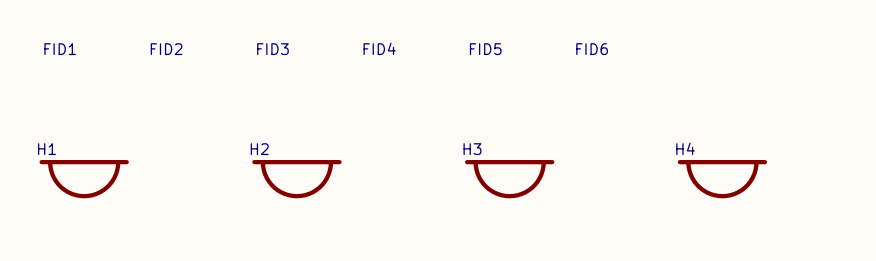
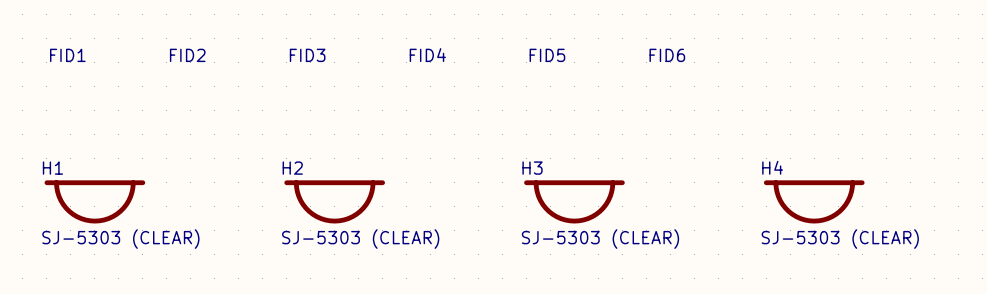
H1 value: none -> SJ-5303 (CLEAR) (120, 239)
H2 value: none -> SJ-5303 (CLEAR) (360, 239)
H3 value: none -> SJ-5303 (CLEAR) (600, 239)
H4 value: none -> SJ-5303 (CLEAR) (840, 239)

